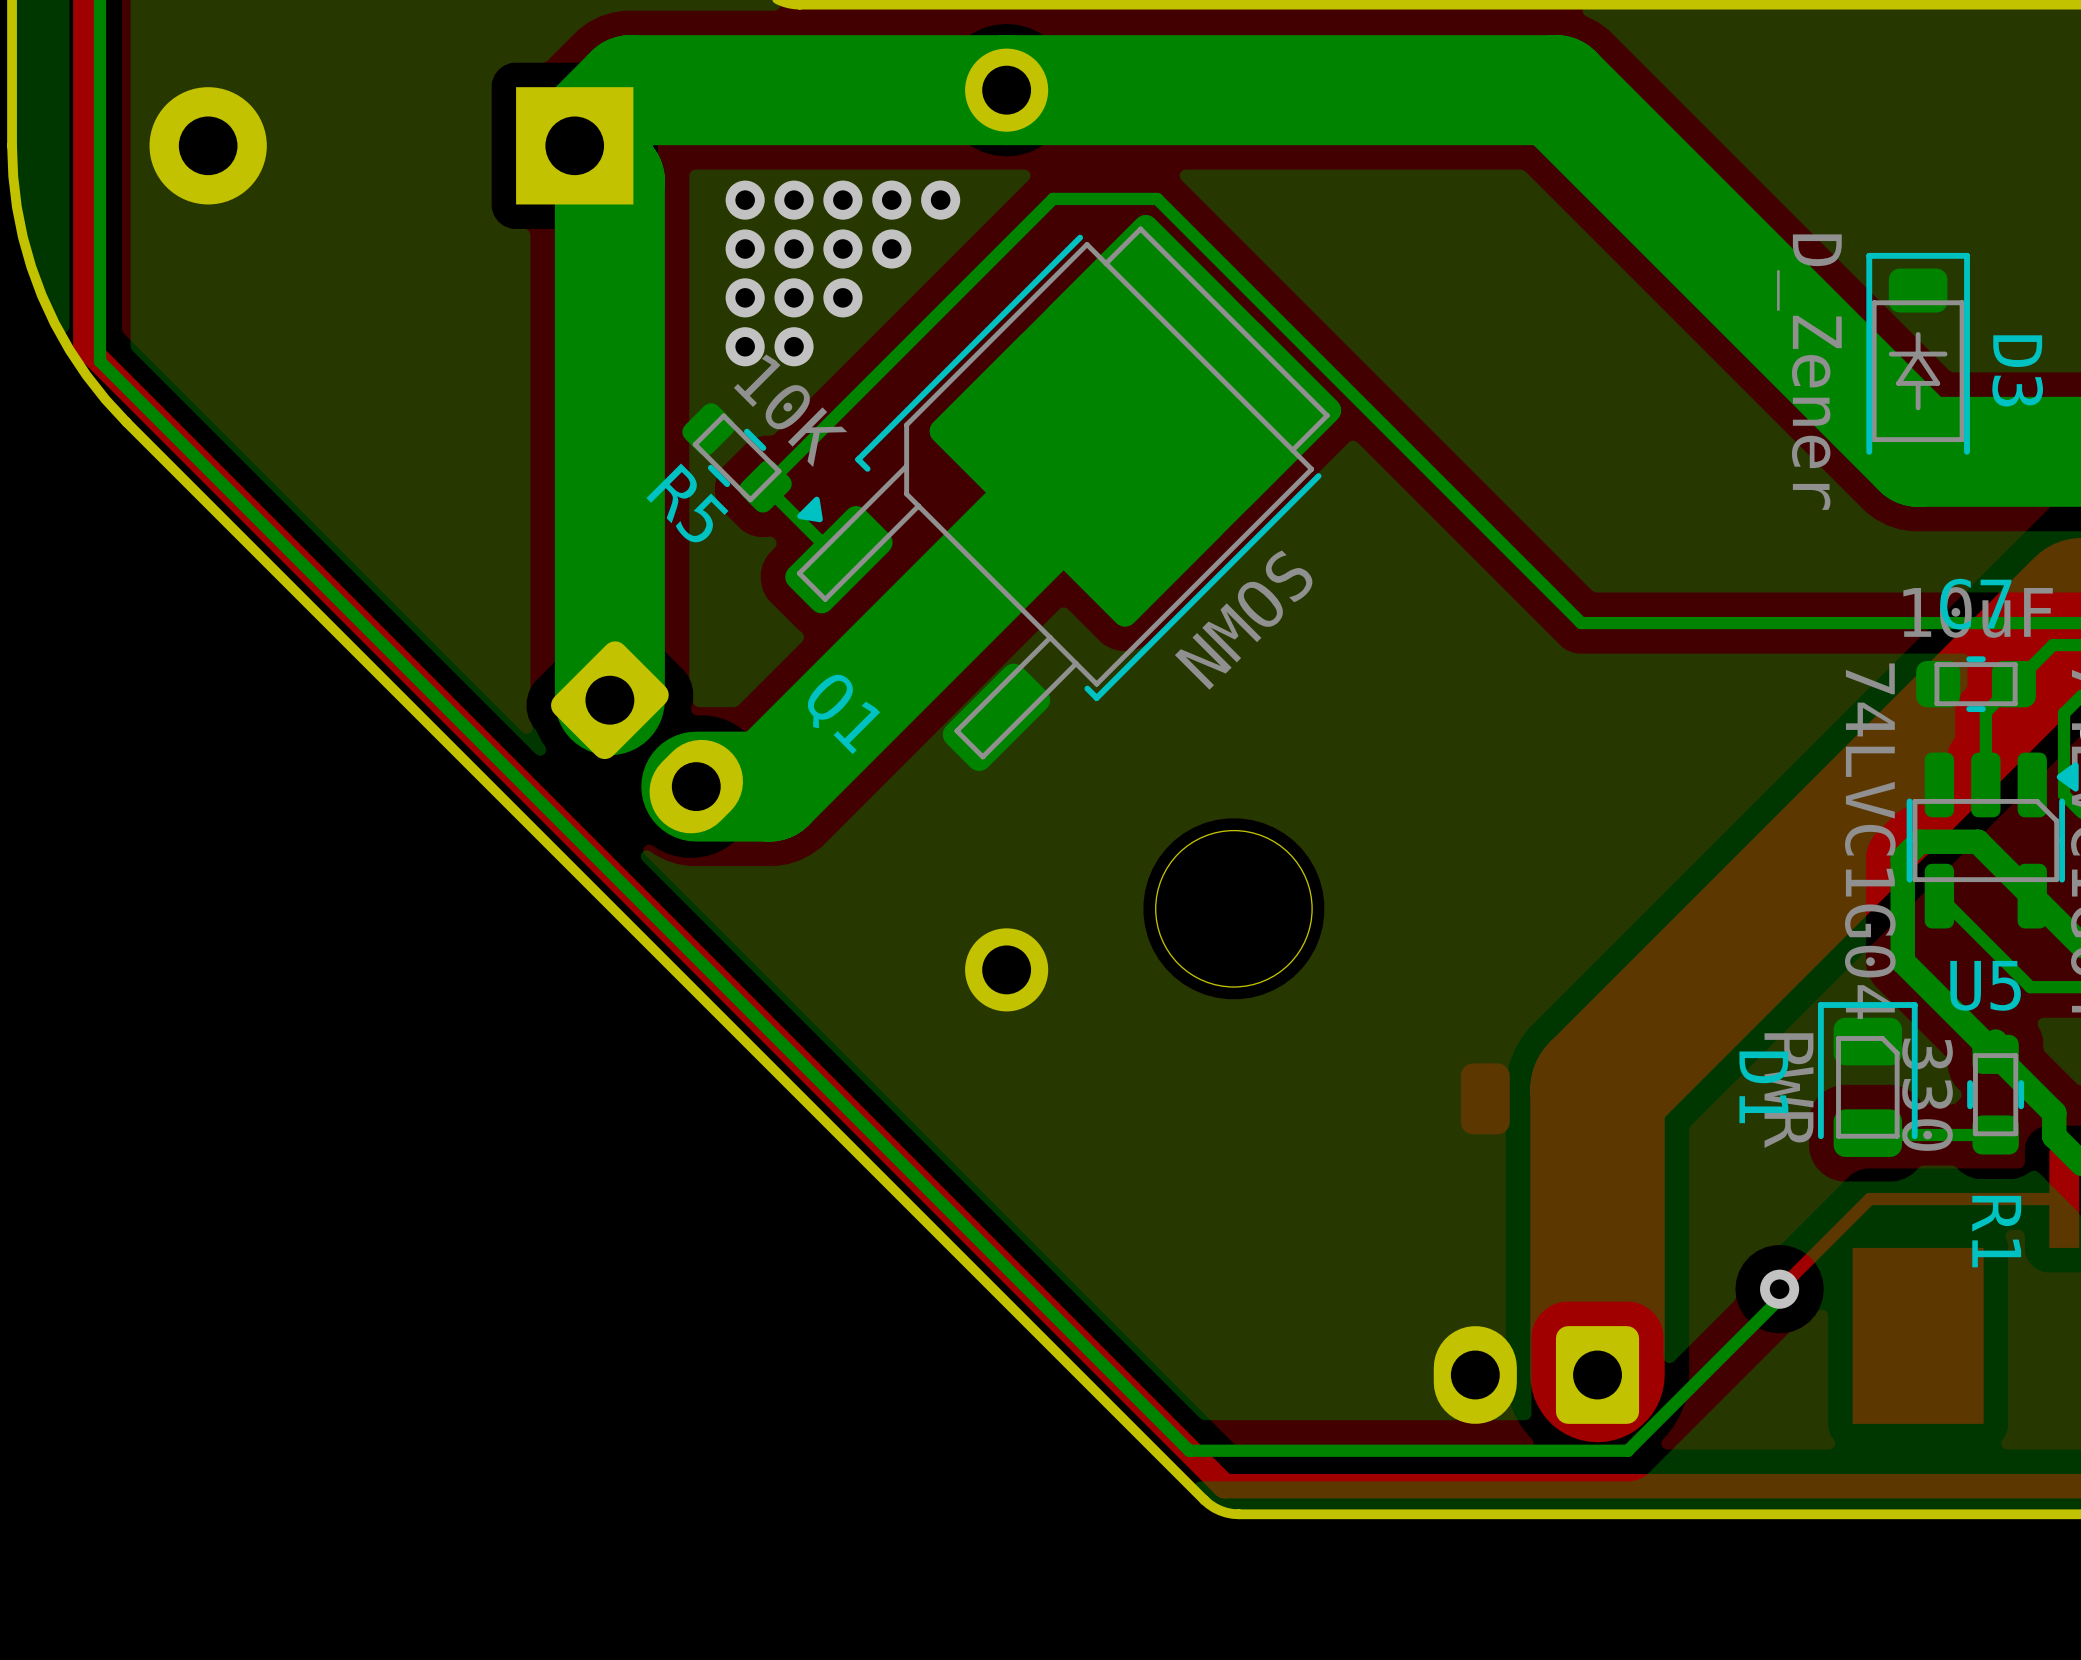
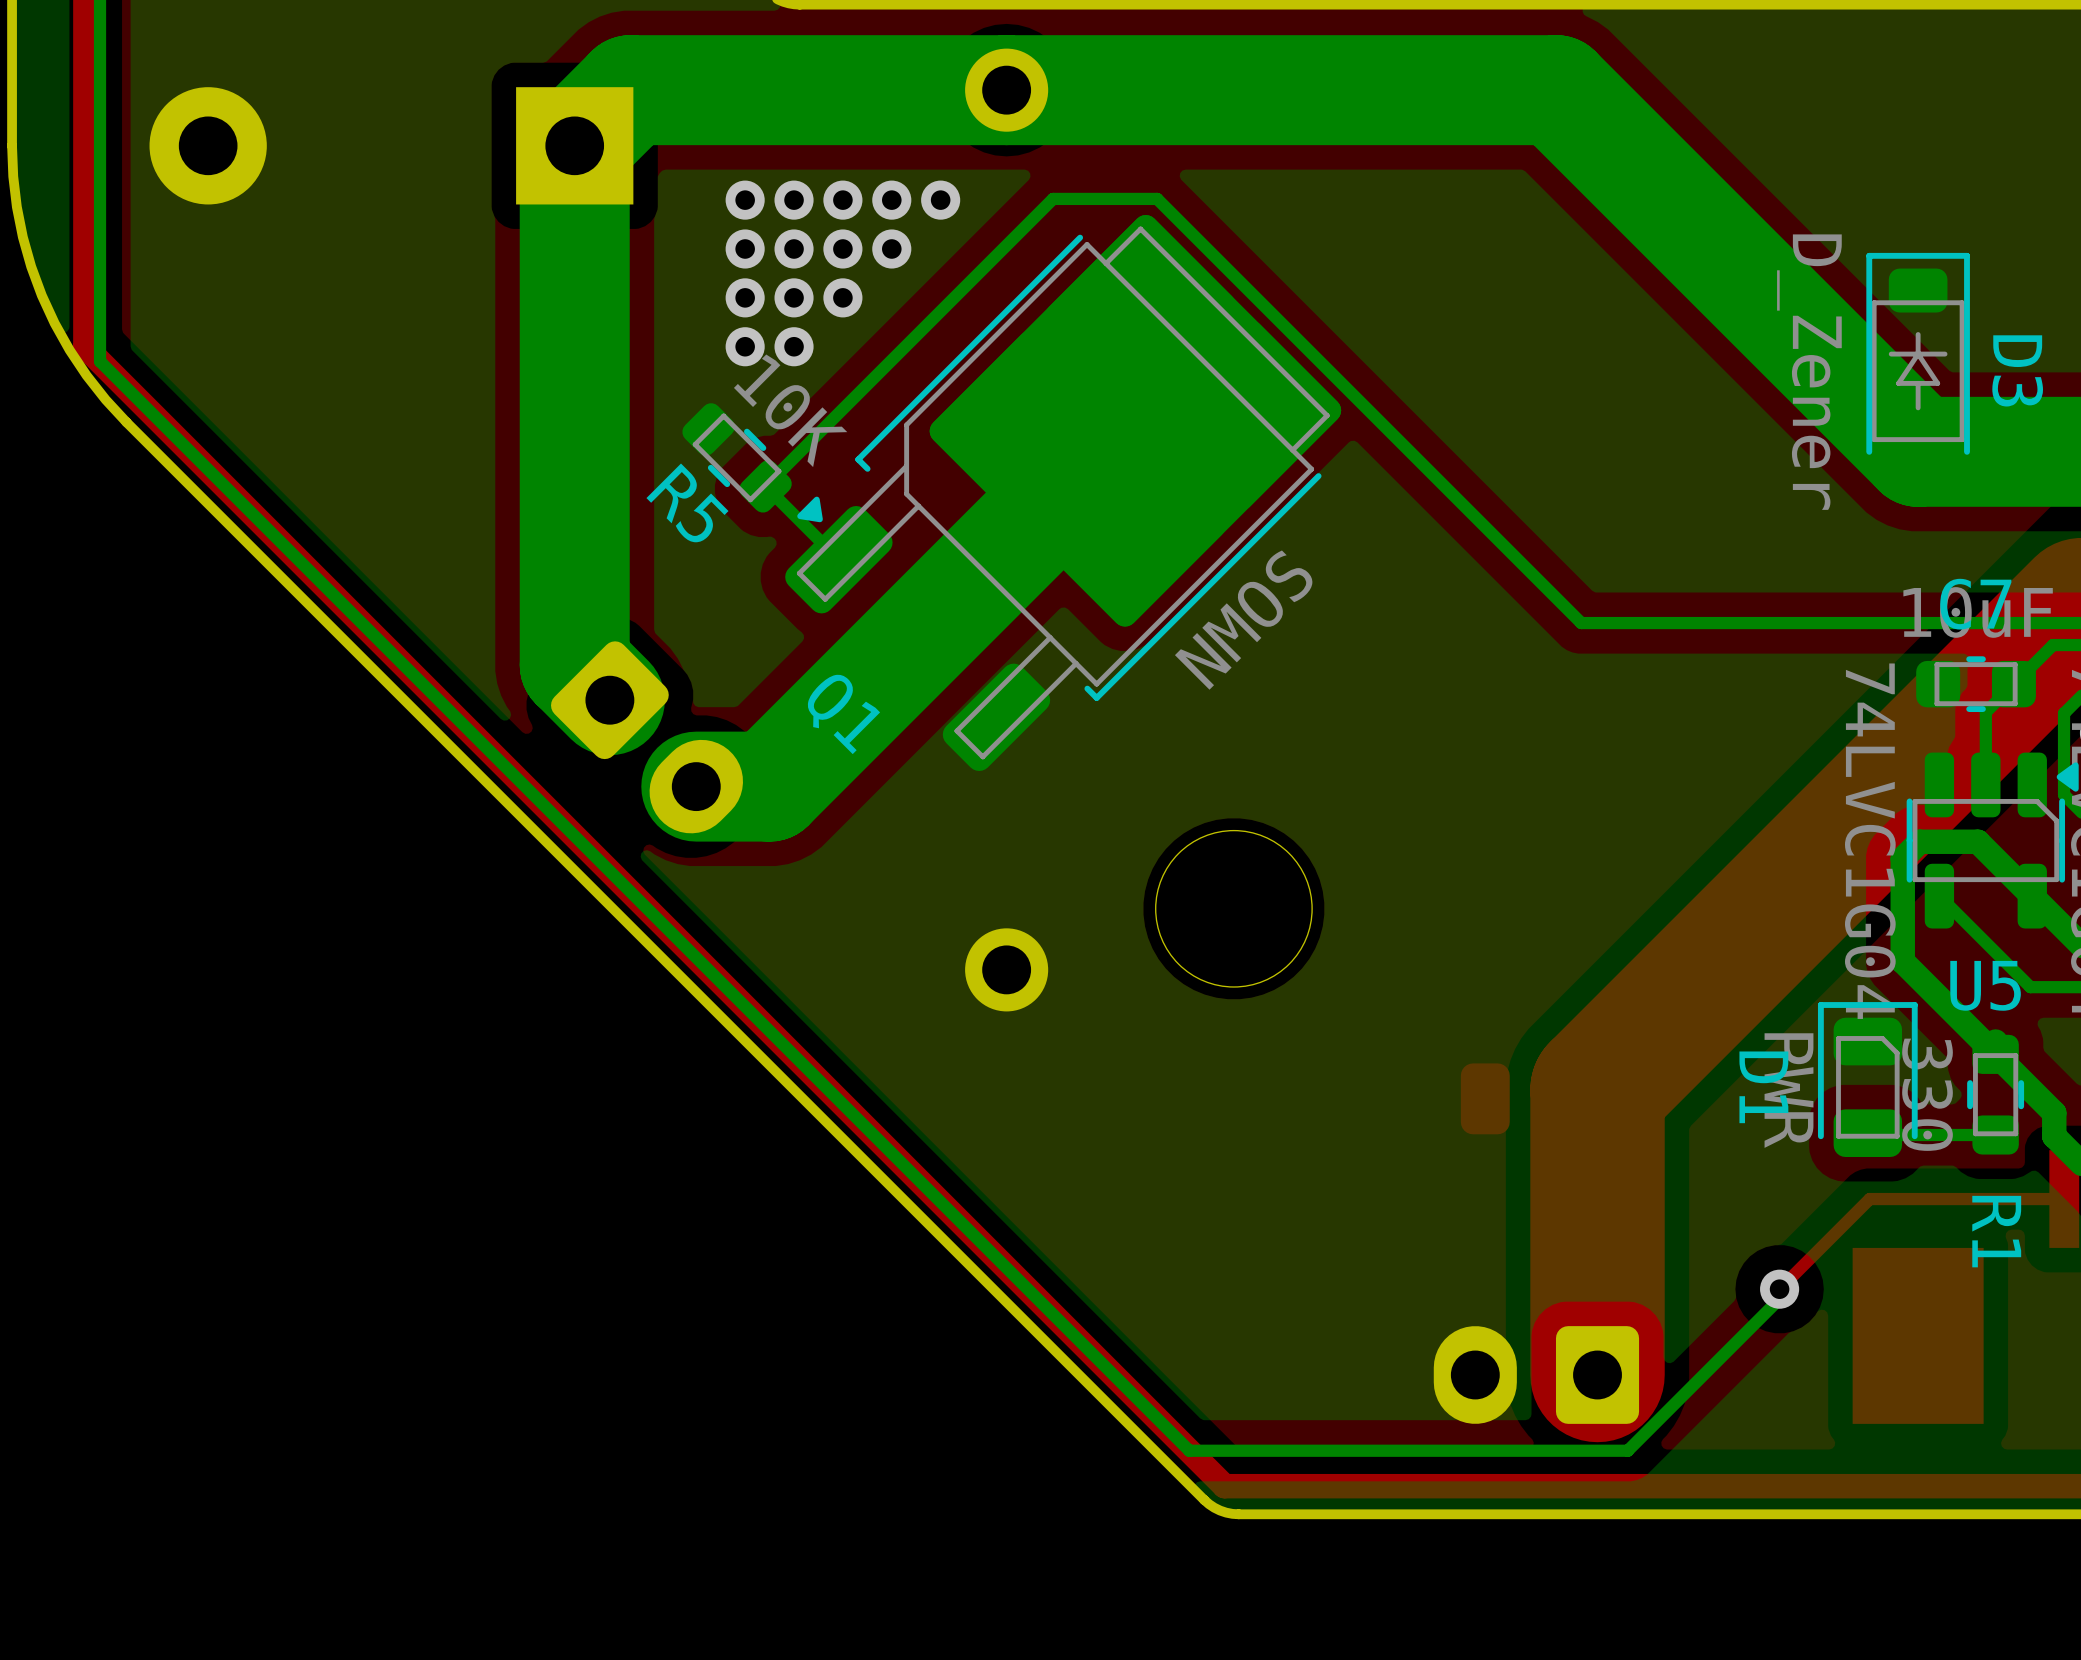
bottom track: (574, 145) (609, 180) (609, 700) -> (574, 145) (574, 665) (609, 700)

